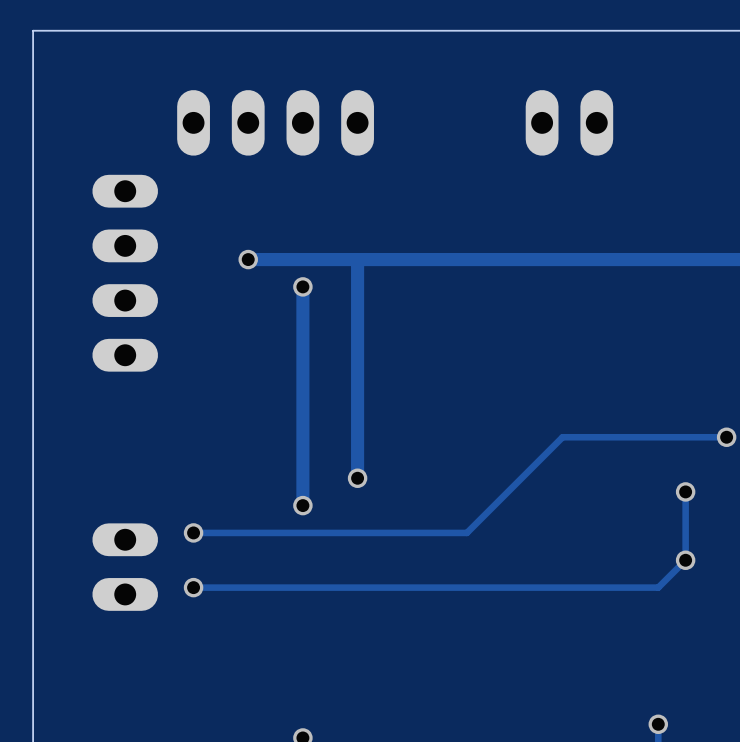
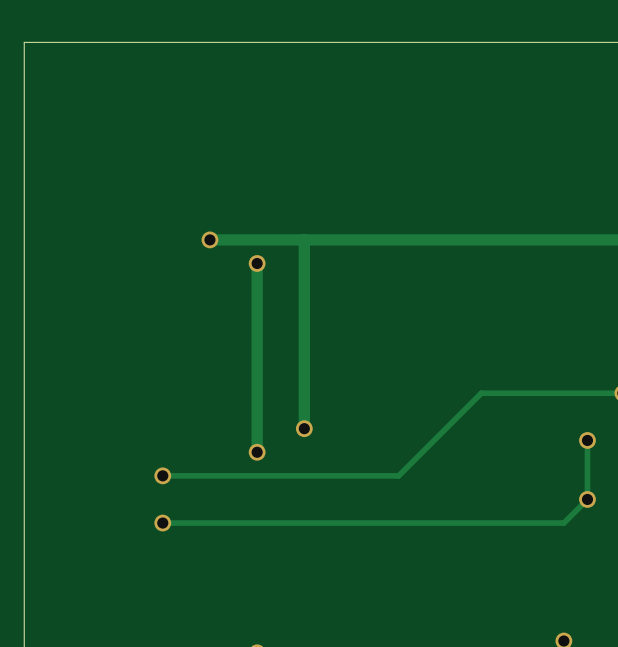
part: (275, 122) -> none
part: (569, 122) -> none
part: (125, 273) -> none
part: (125, 567) -> none

